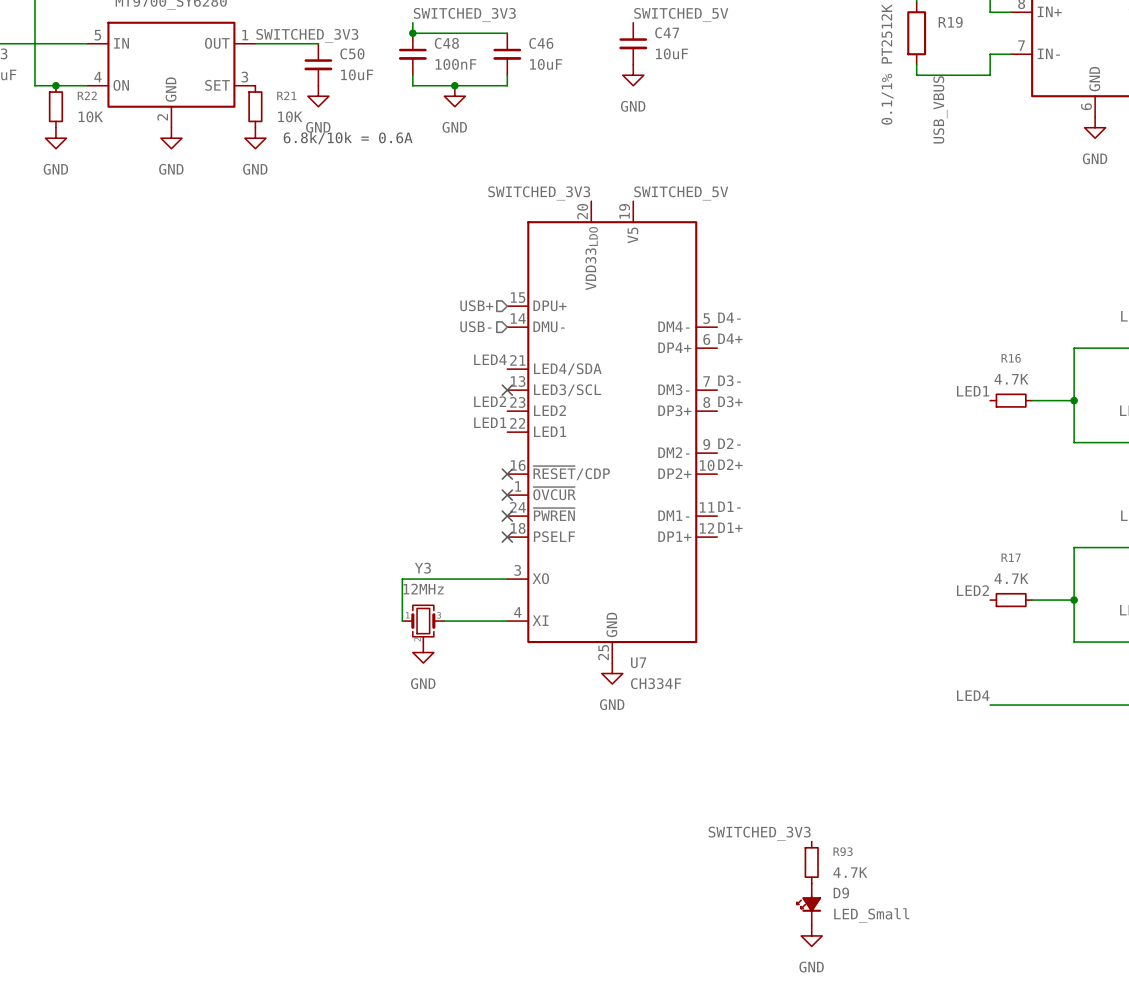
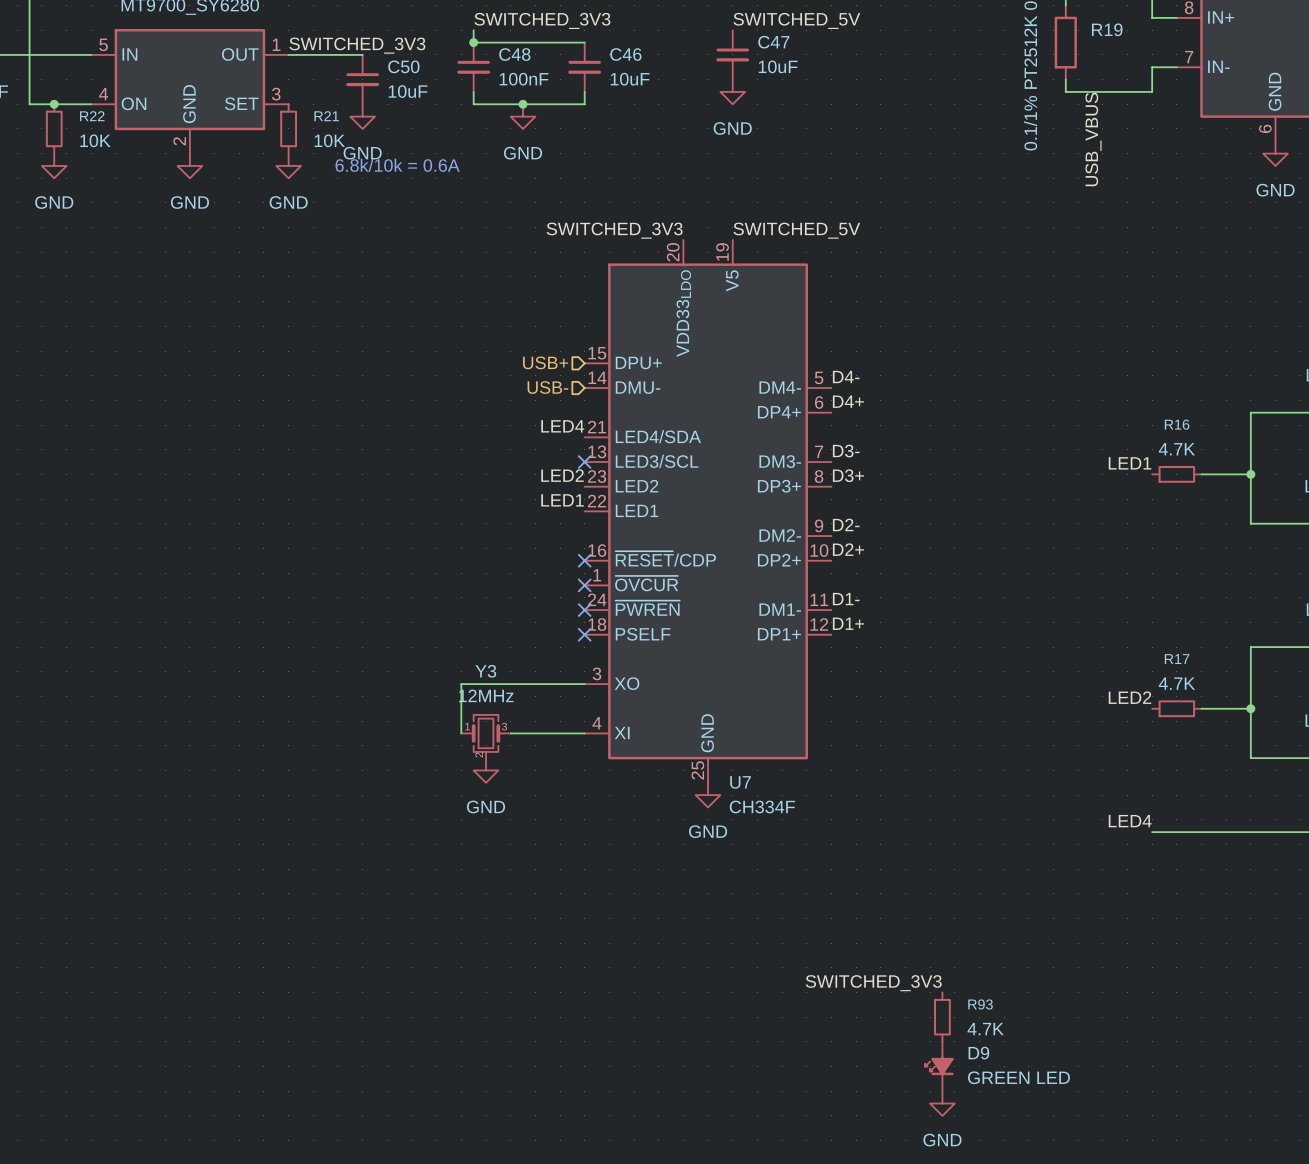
D9 value: LED_Small (871, 915) -> GREEN LED (1018, 1077)

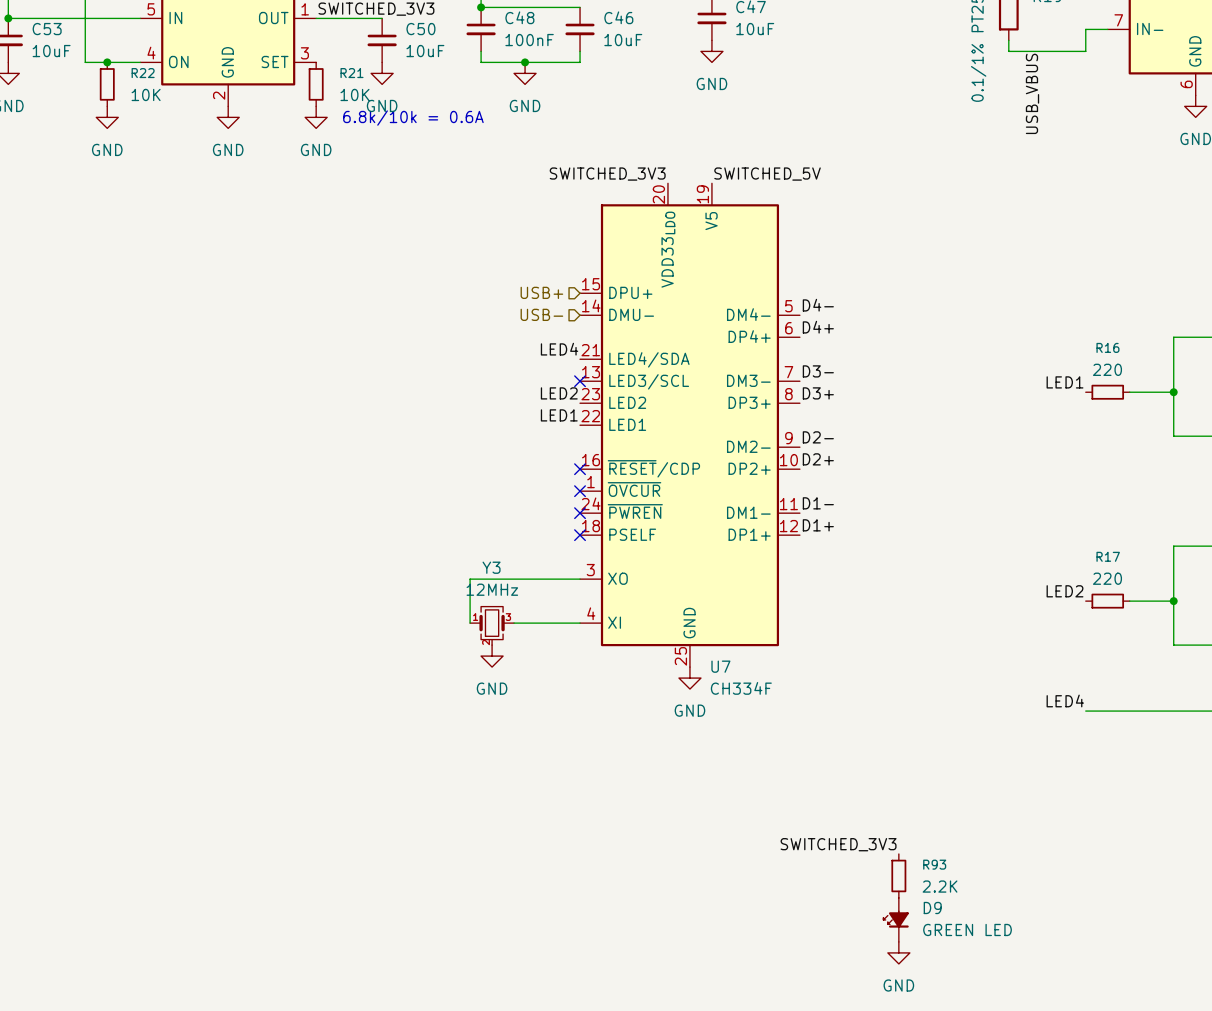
R16 value: 4.7K (1176, 449) -> 220 (1107, 369)
R17 value: 4.7K (1176, 683) -> 220 (1107, 578)
R93 value: 4.7K (985, 1029) -> 2.2K (940, 886)

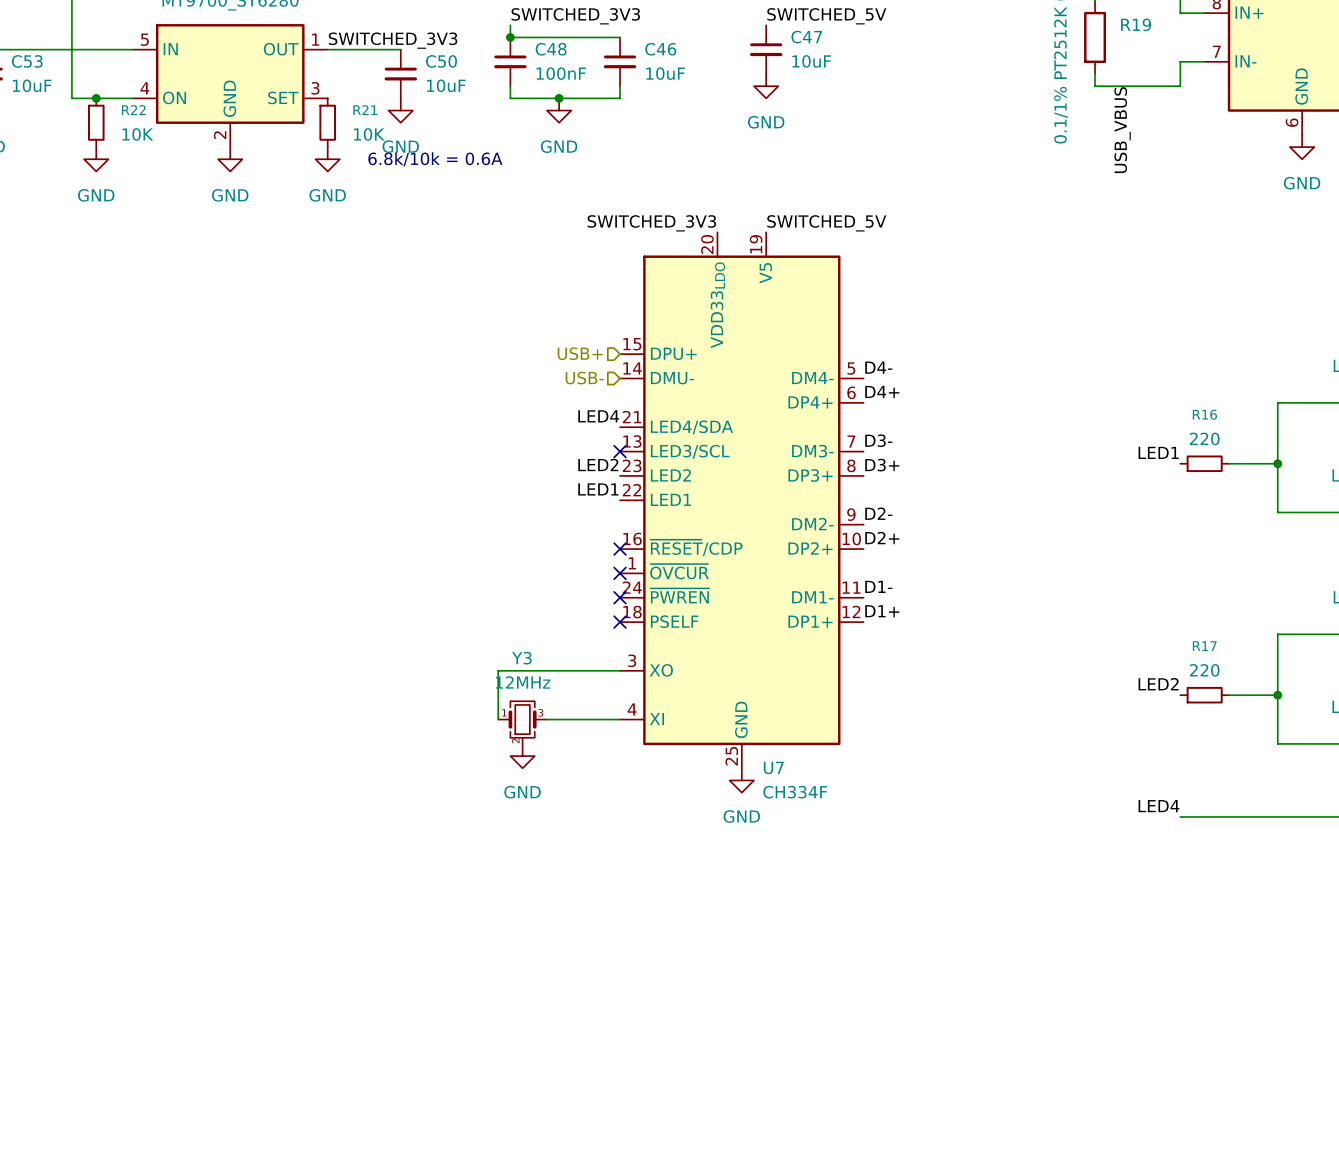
label: SWITCHED_3V3 (838, 844) -> none
R93: 2.2K (898, 875) -> none
D9: GREEN LED (896, 919) -> none
power symbol: GND (898, 952) -> none

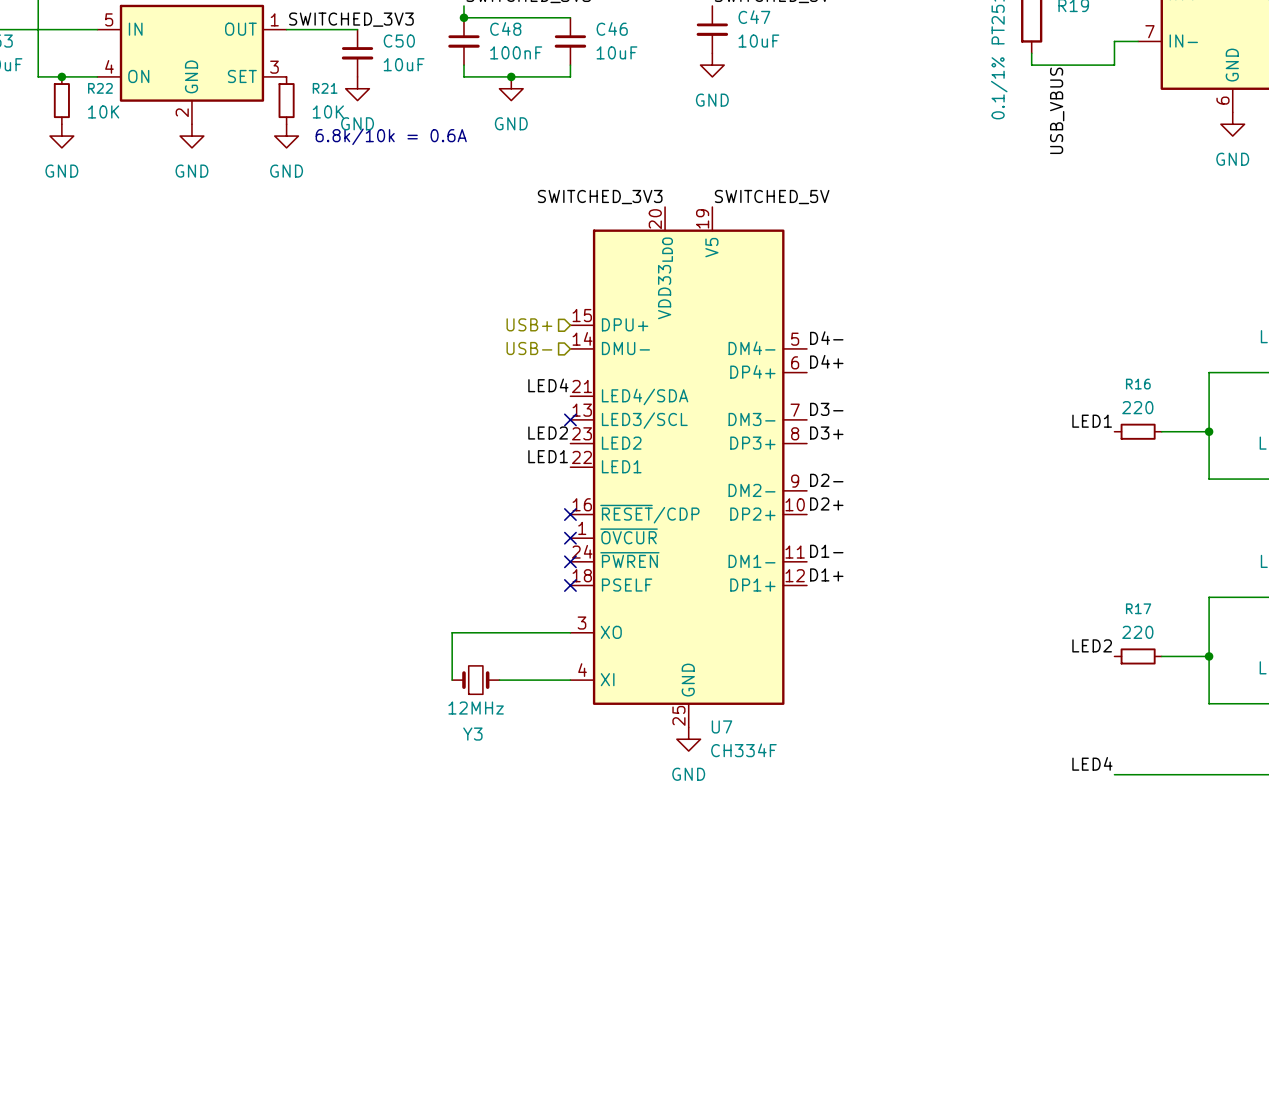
Y3 name position: Y3 (521, 658) -> Y3 (472, 734)
Y3 value position: 12MHz (523, 682) -> 12MHz (476, 708)
Y3 symbol: [498, 701, 547, 744] -> [452, 665, 500, 695]
power symbol: GND (522, 756) -> none

